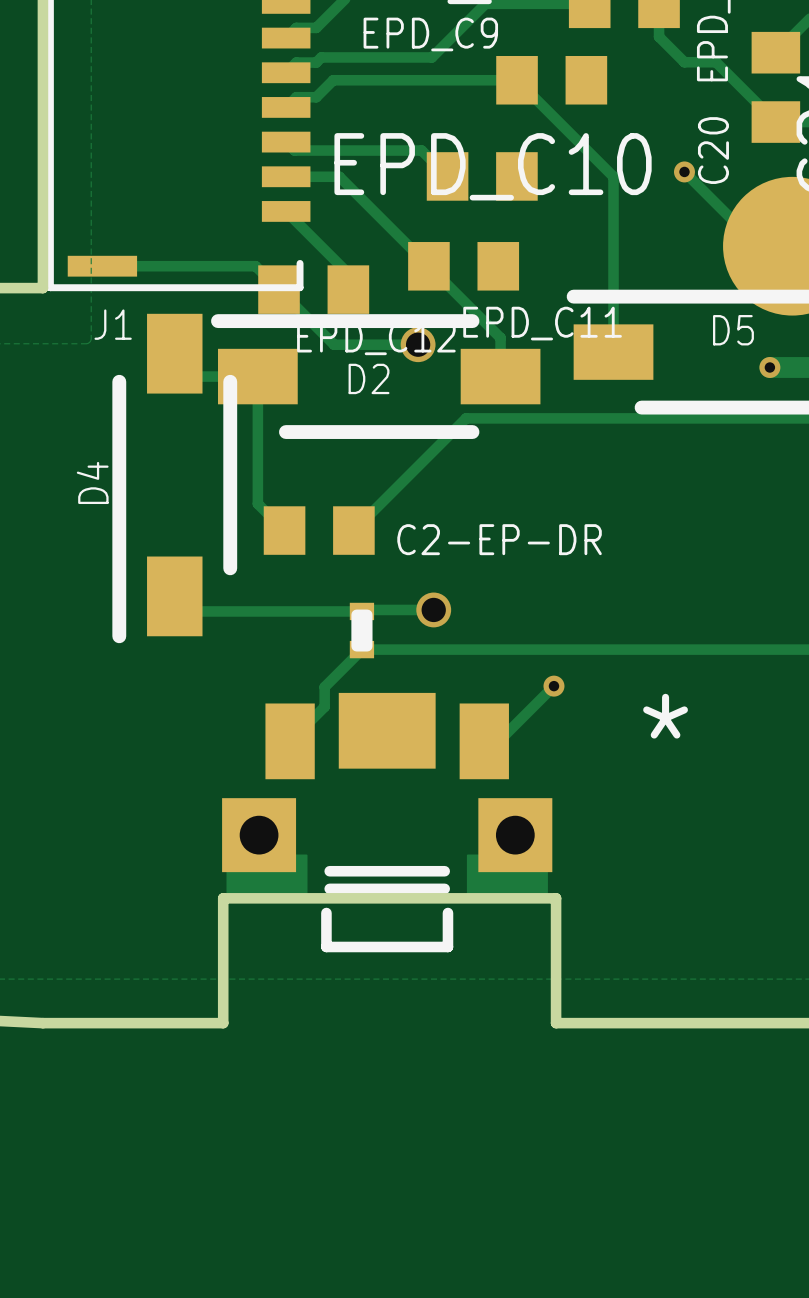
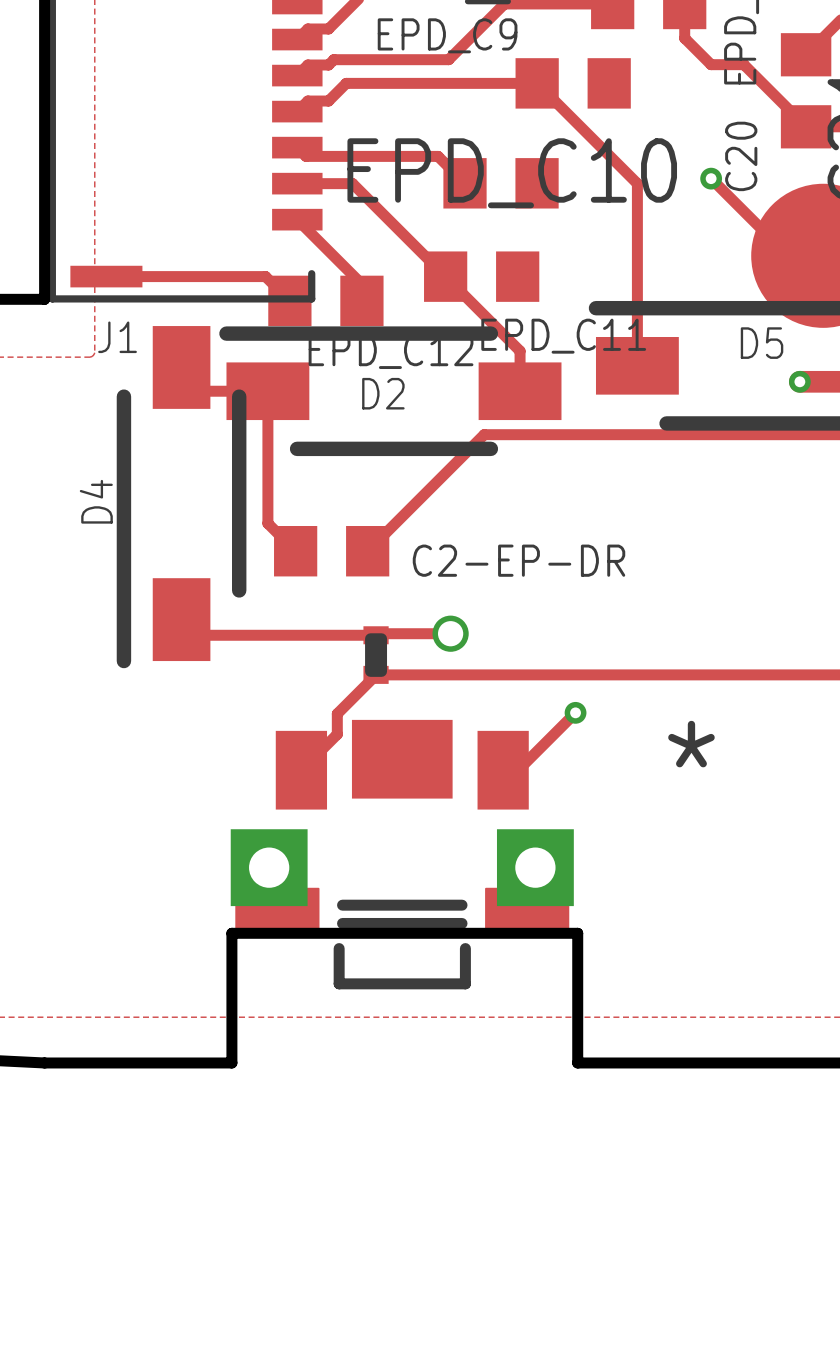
track: (279, 289) (334, 344) (409, 344) -> none
via: (418, 344) -> none

